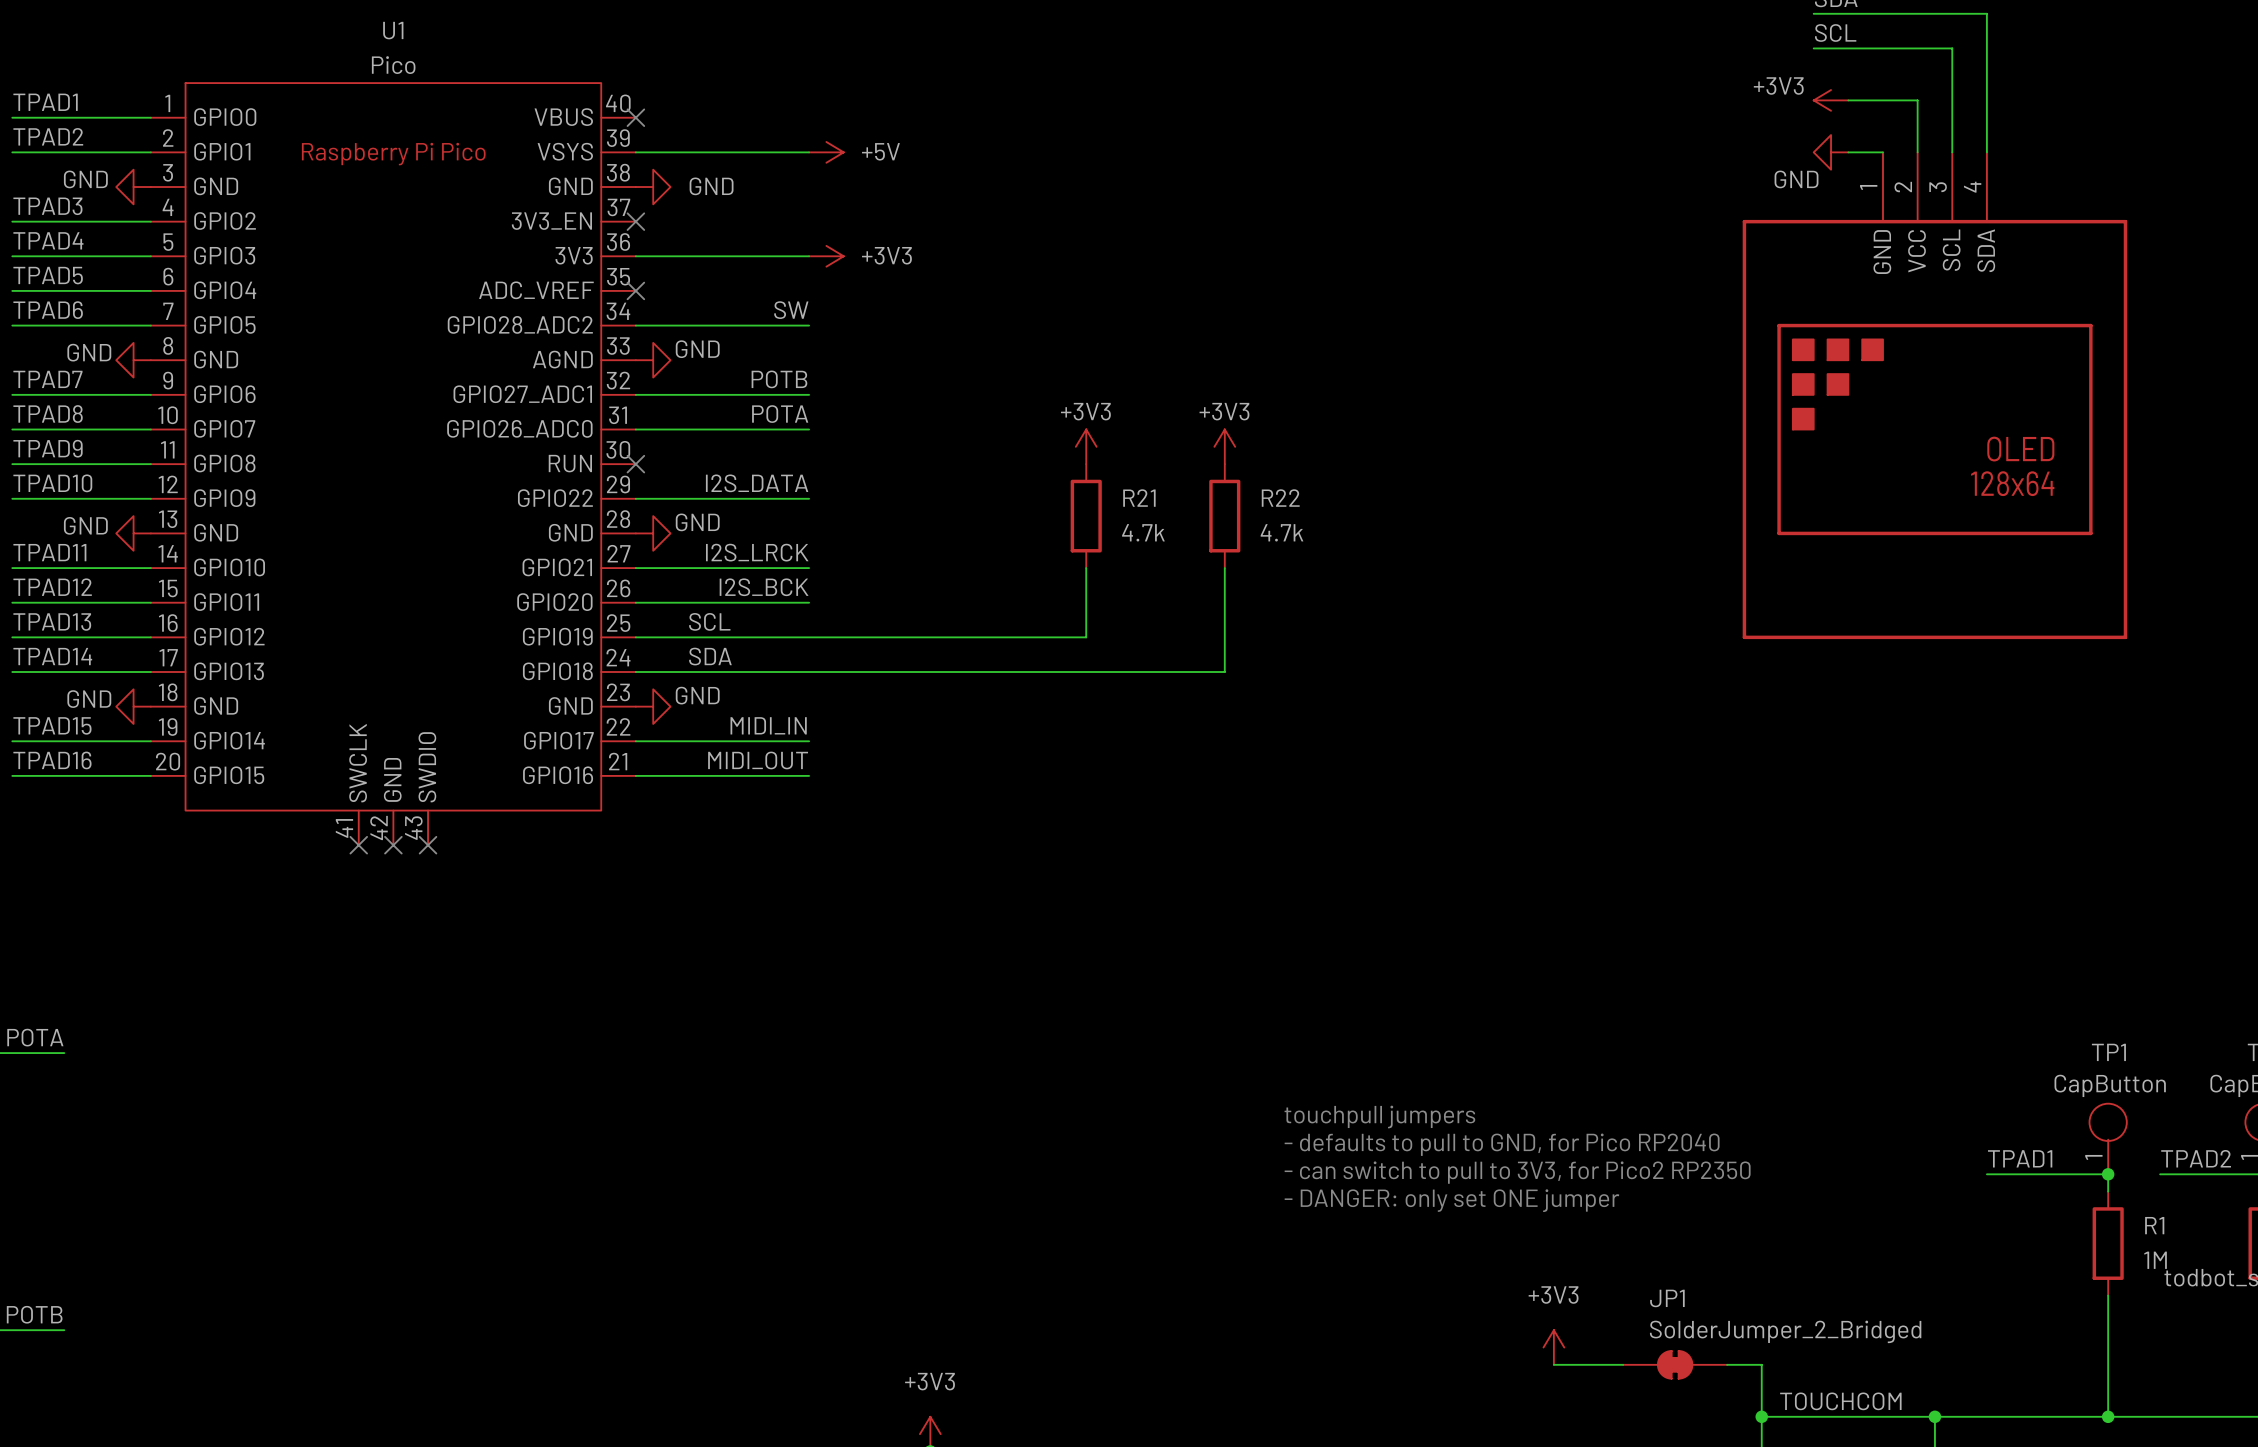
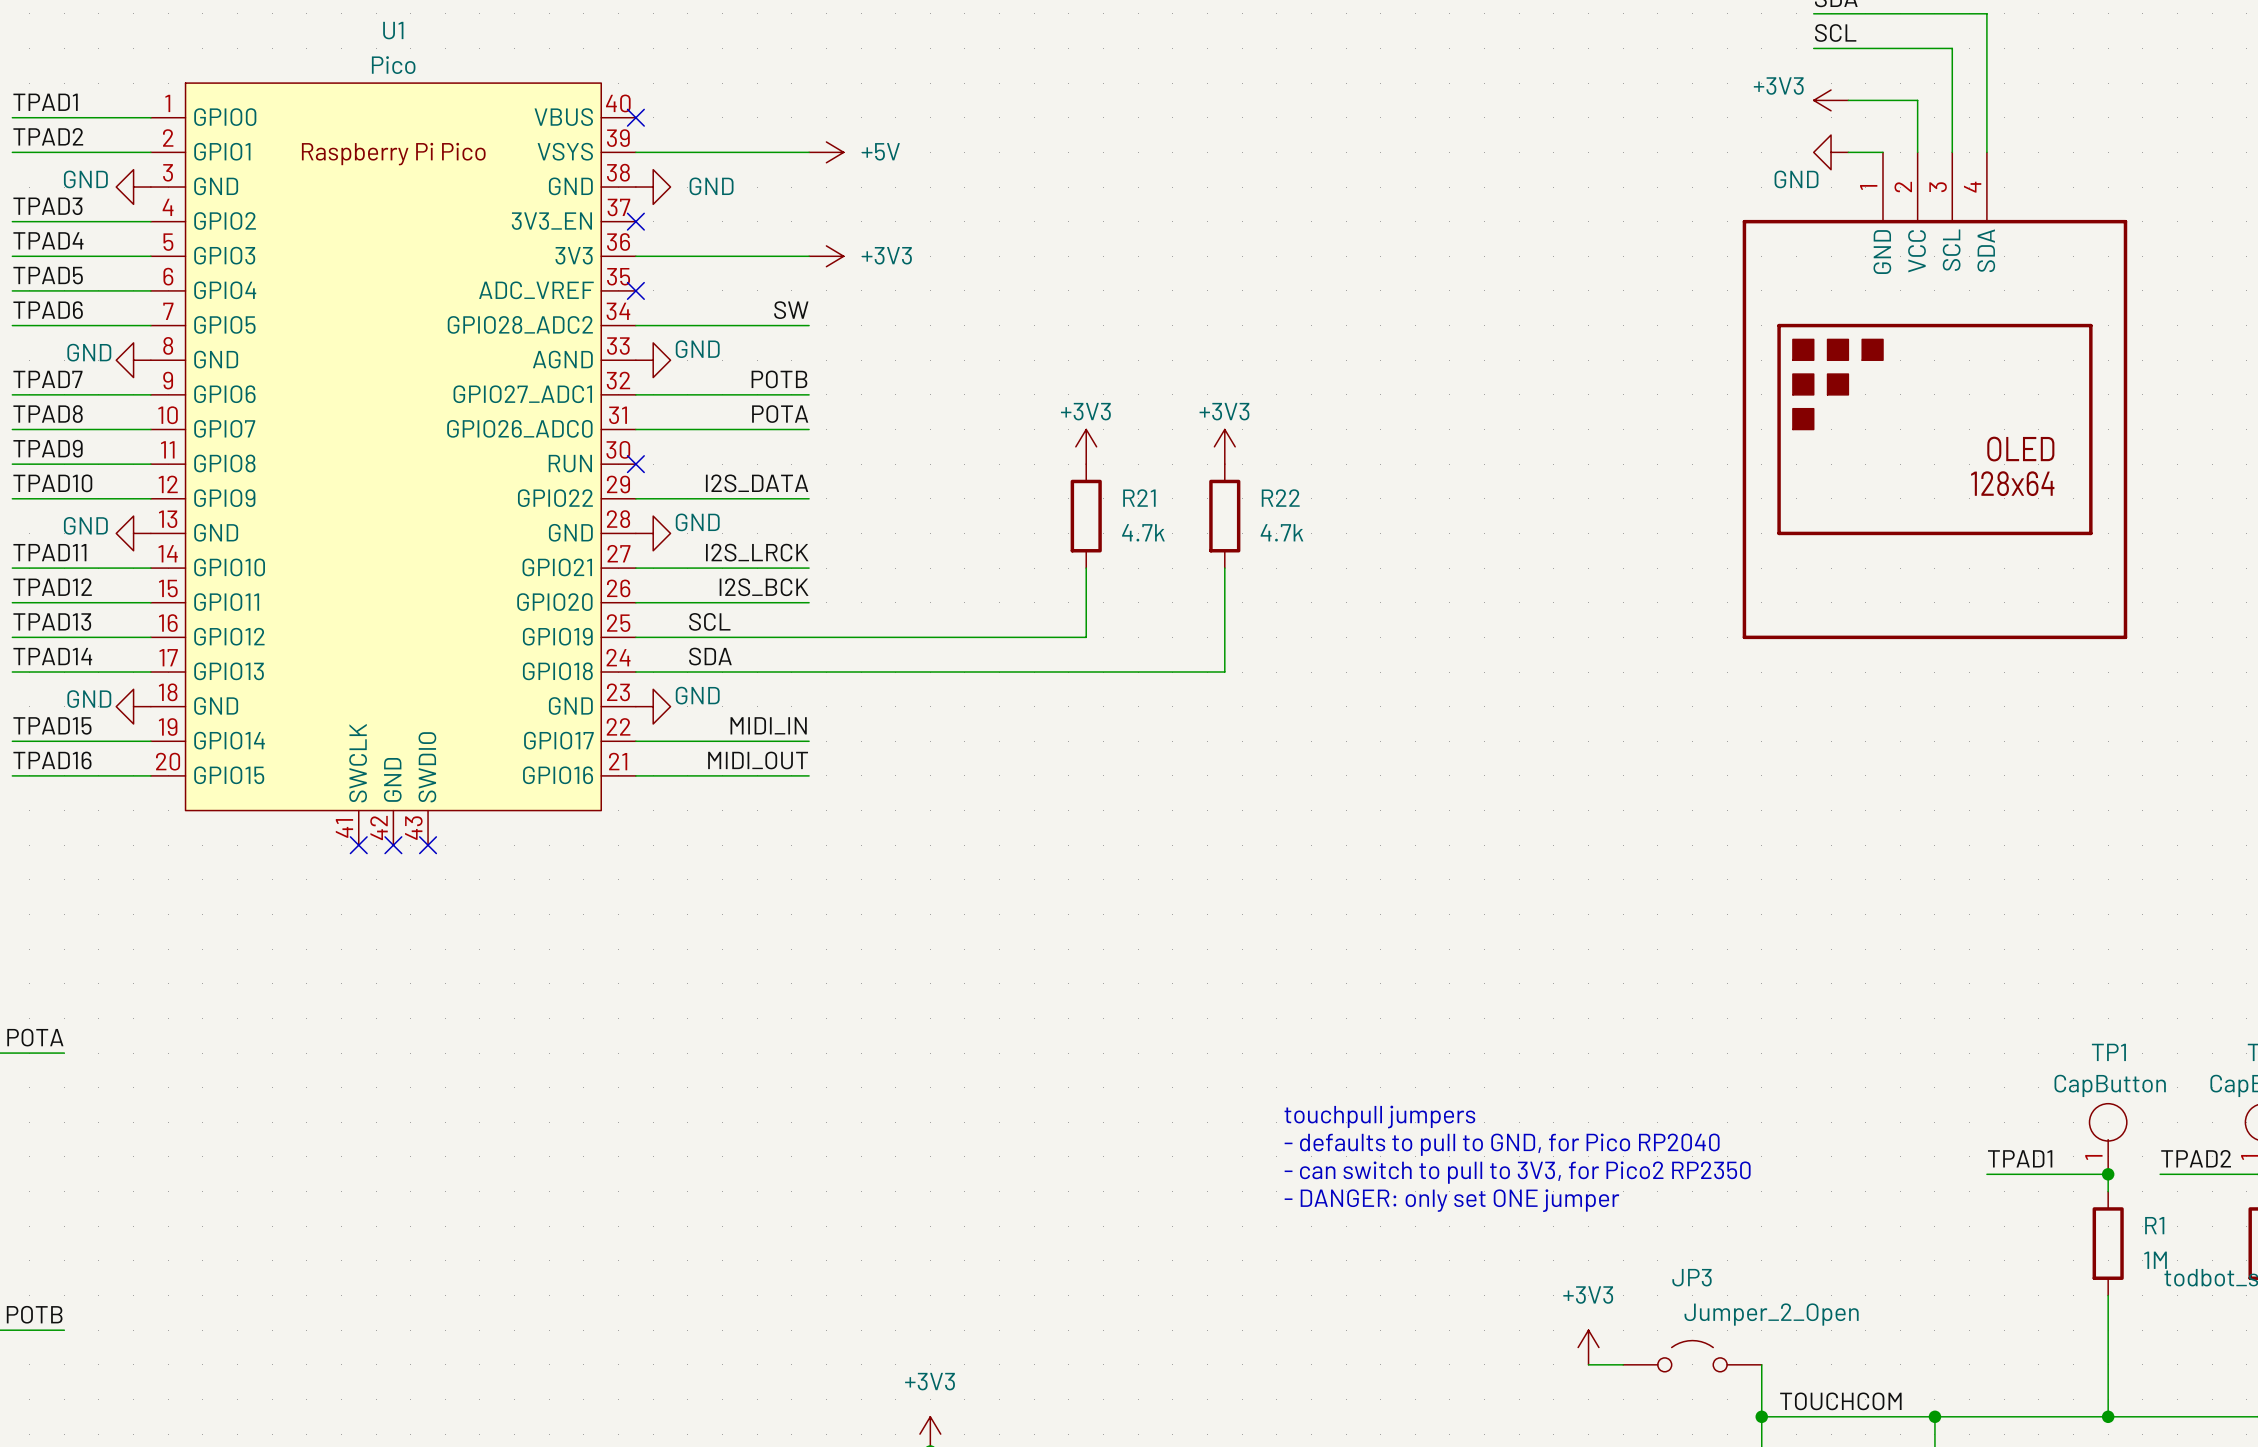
power symbol position: +3V3 (1553, 1347) -> +3V3 (1588, 1347)
JP3: none -> Jumper_2_Open (1692, 1356)
wire: (1553, 1364) (1588, 1364) -> none
JP1: SolderJumper_2_Bridged (1675, 1364) -> none

